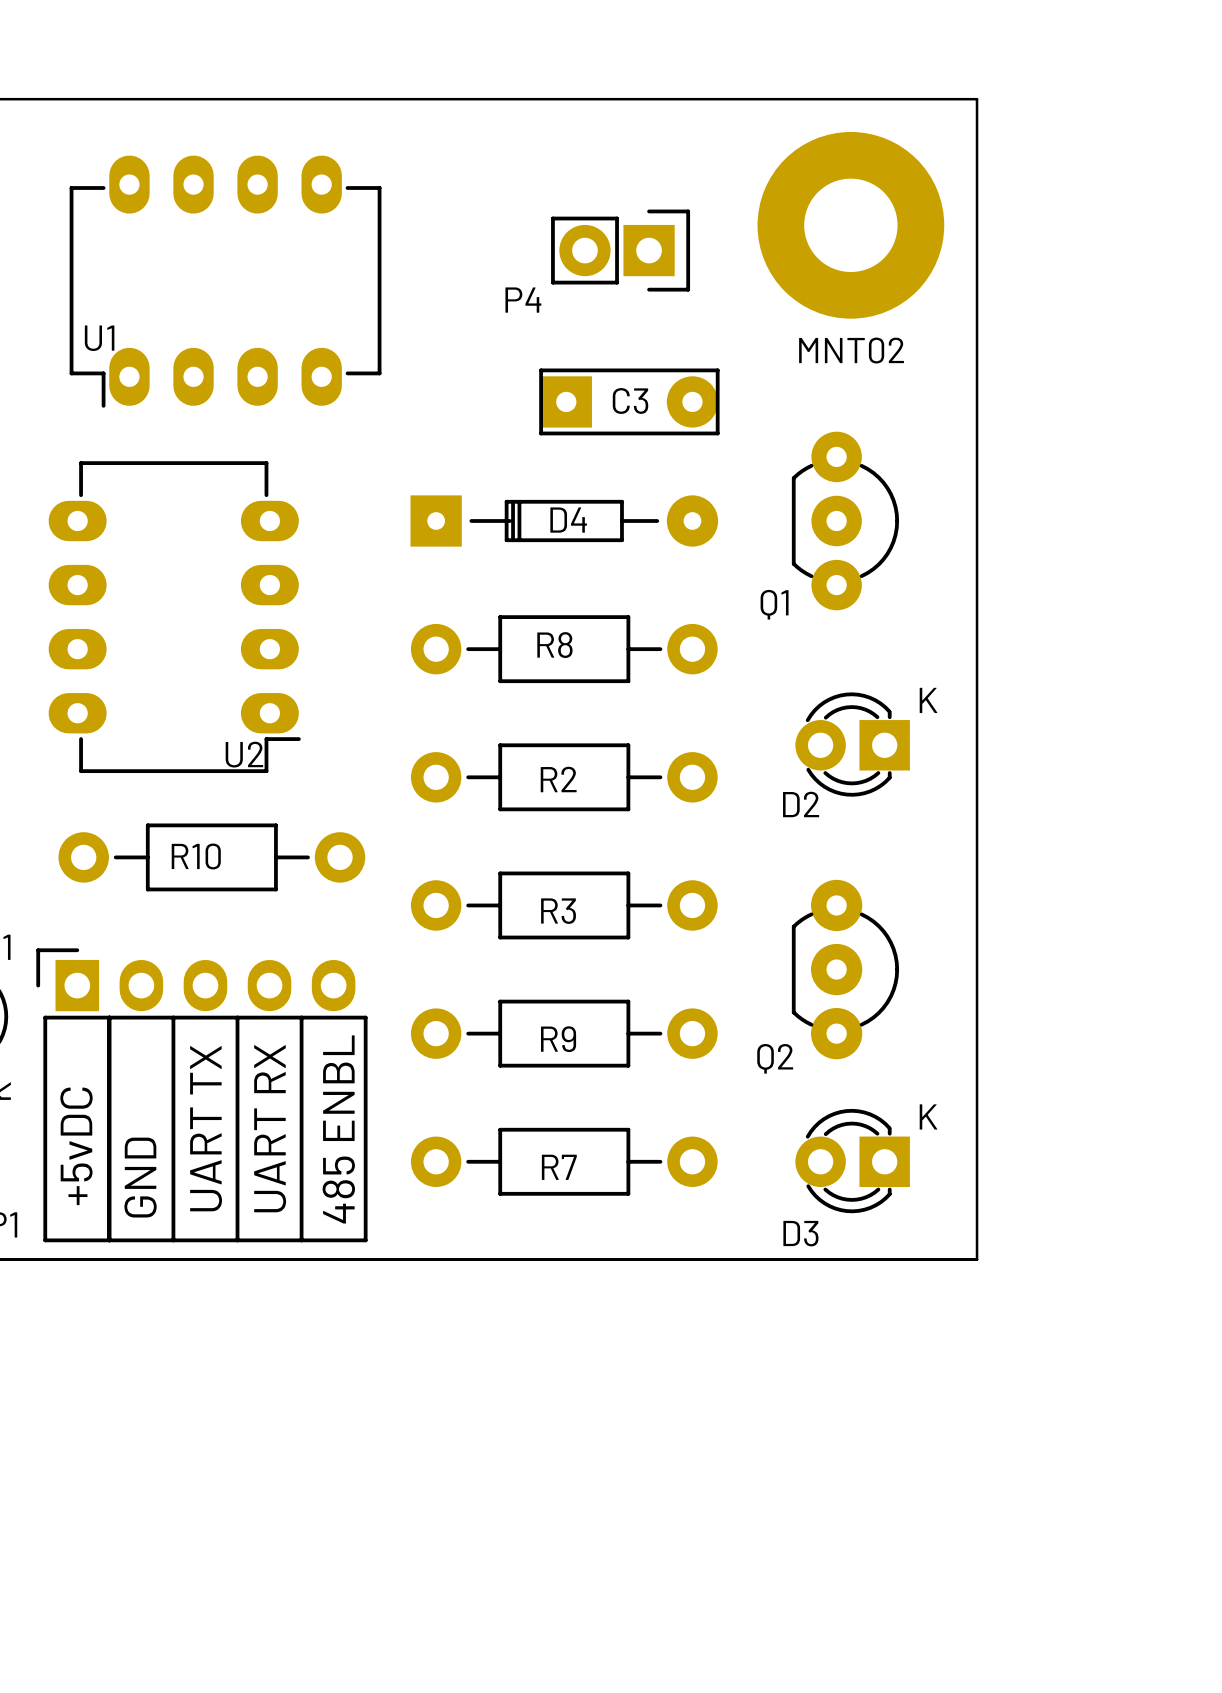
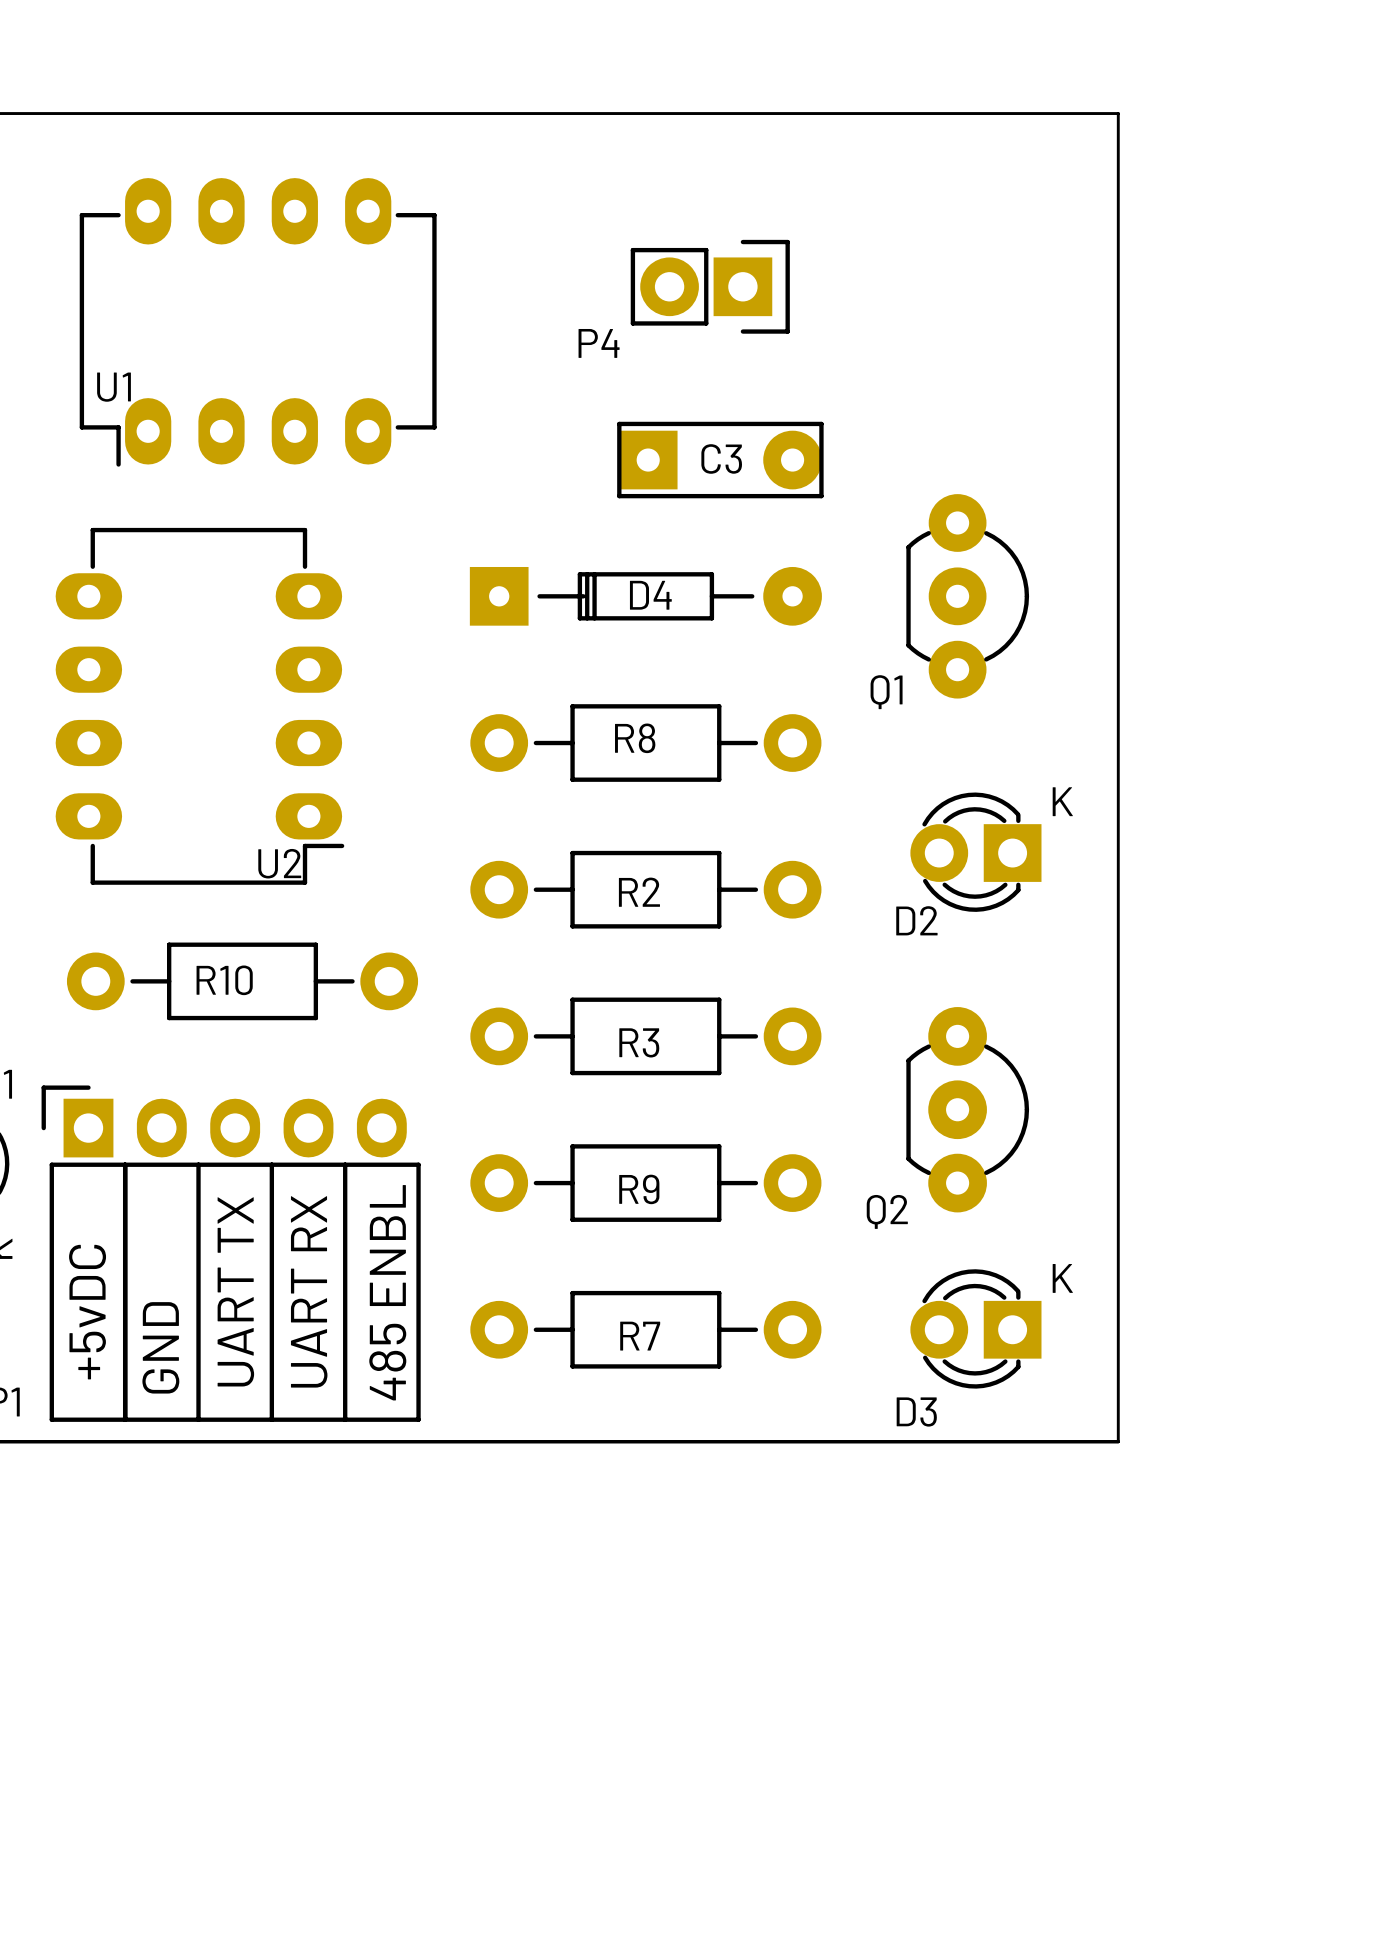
MNT02: (850, 225) -> none

